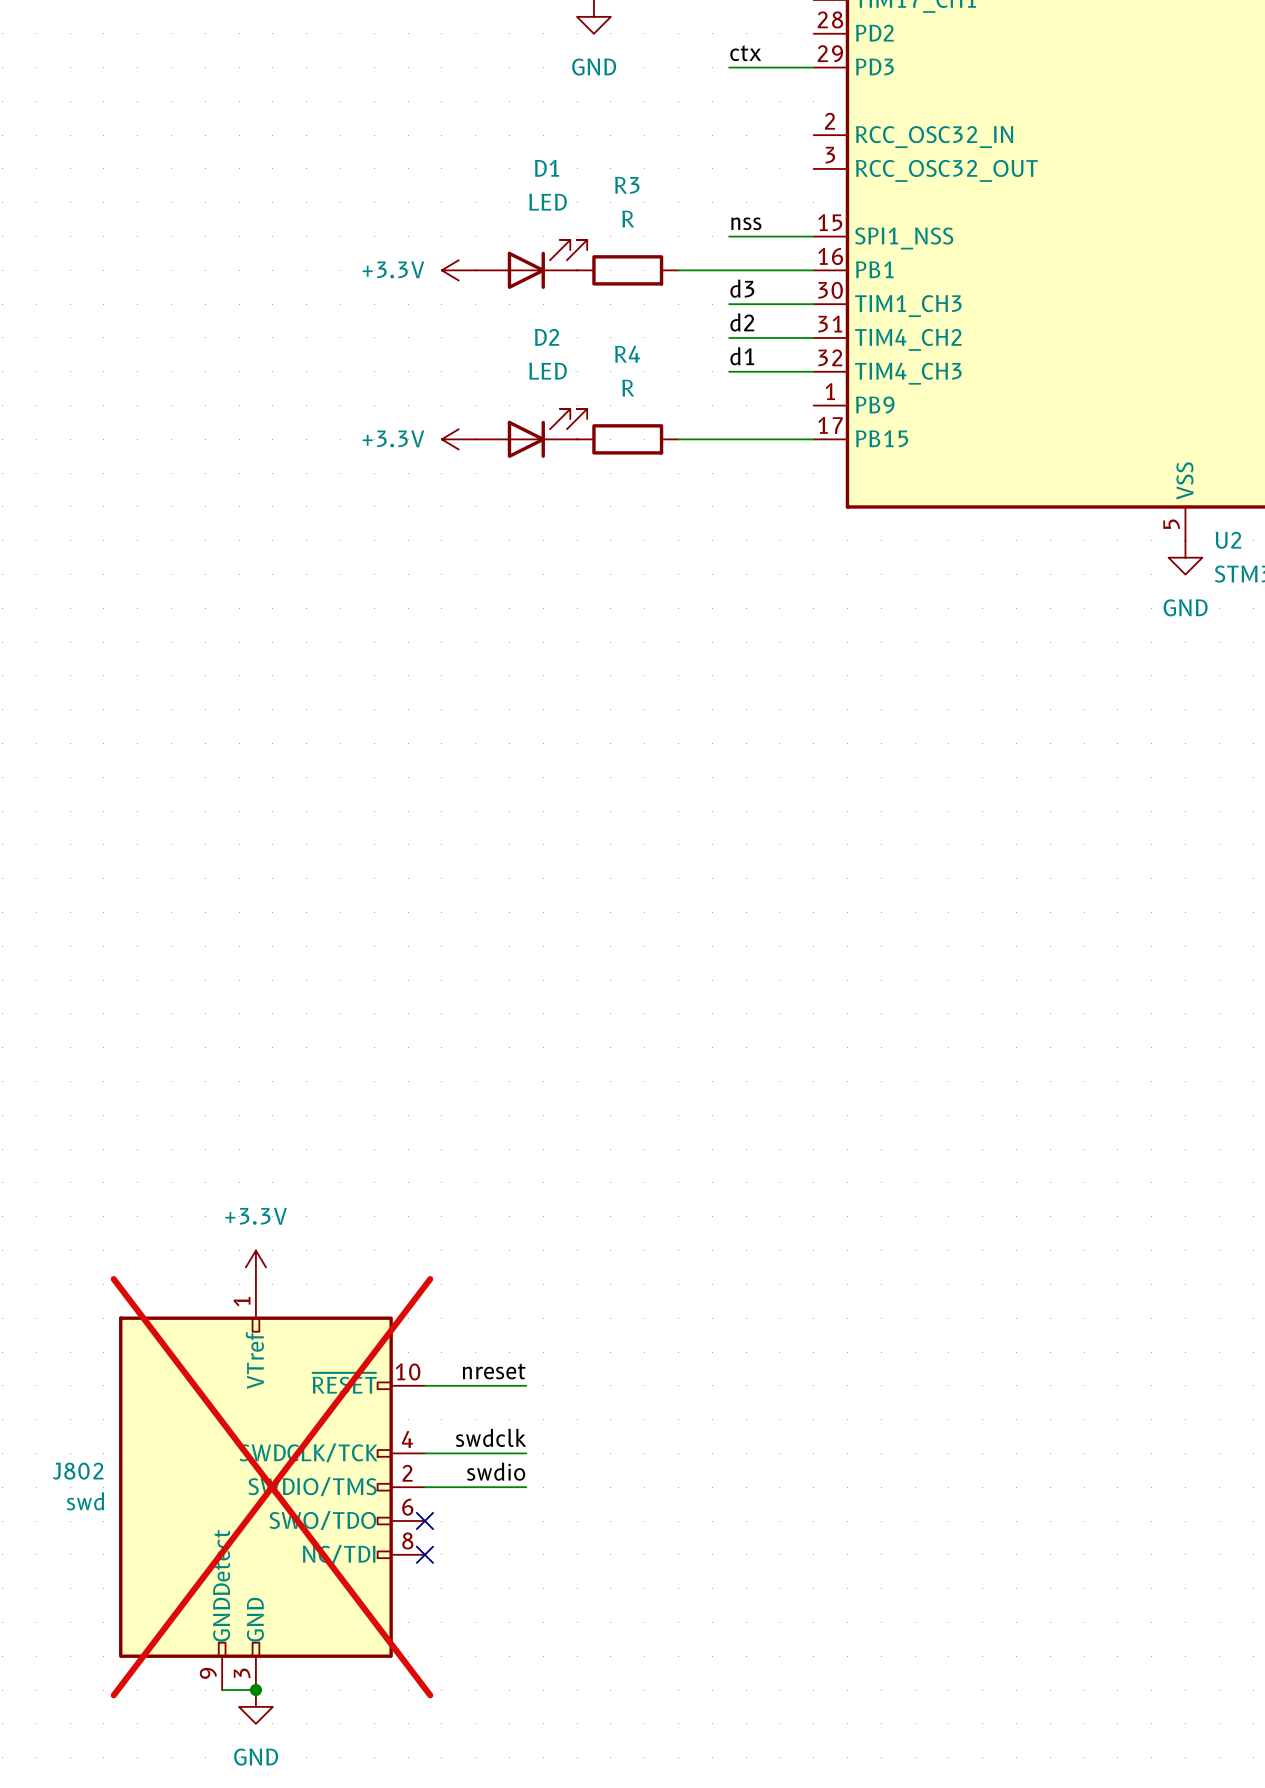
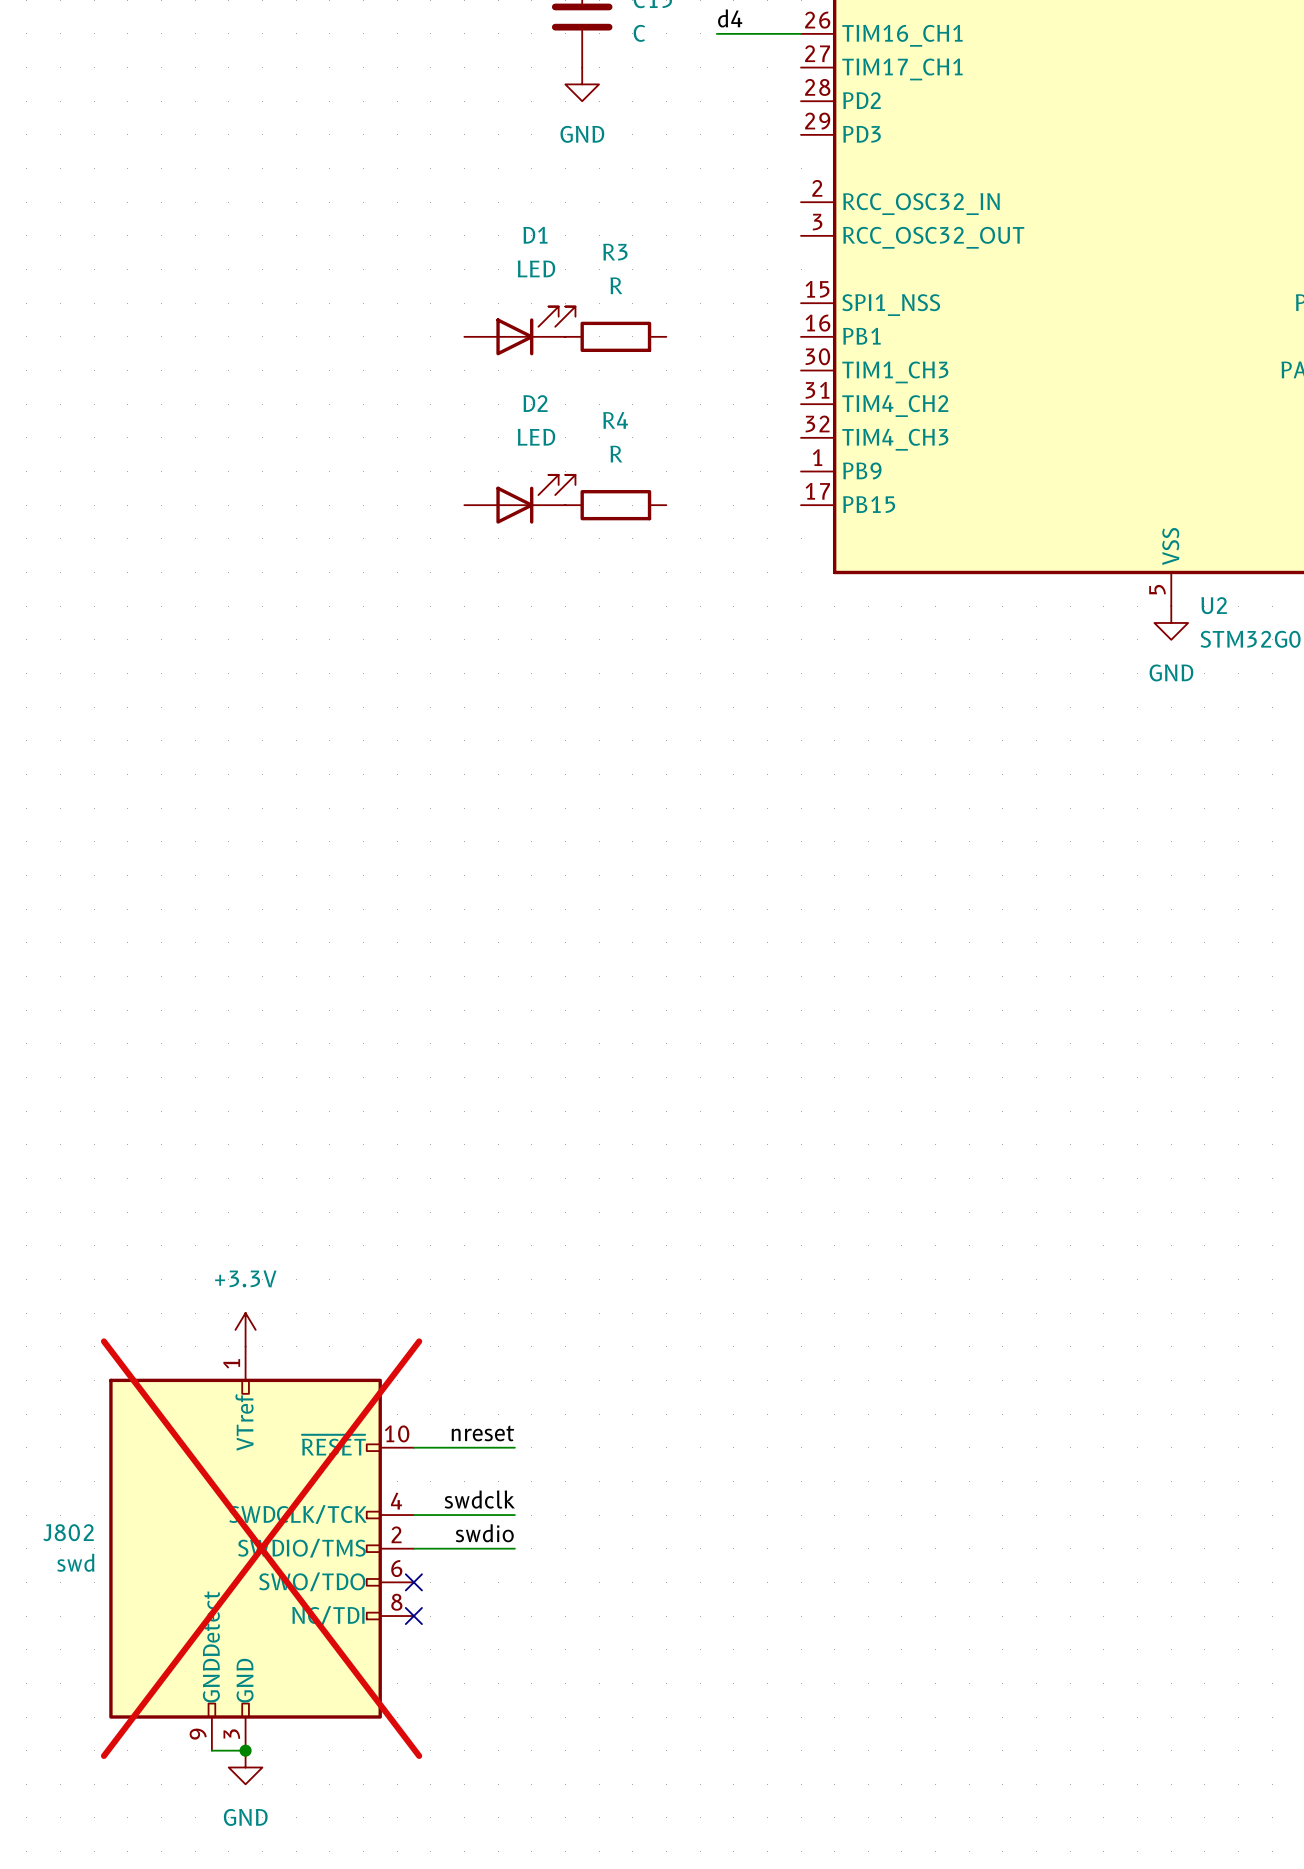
label: ctx (745, 53) -> none
wire: (729, 67) (813, 67) -> none
label: nss (746, 223) -> none
wire: (729, 236) (813, 236) -> none
power symbol: +3.3V (458, 270) -> none
wire: (678, 270) (813, 270) -> none
label: d3 (742, 288) -> none
wire: (729, 304) (813, 304) -> none
label: d2 (742, 322) -> none
wire: (729, 337) (813, 337) -> none
label: d1 (742, 356) -> none
wire: (729, 371) (813, 371) -> none
power symbol: +3.3V (458, 439) -> none
wire: (678, 439) (813, 439) -> none

